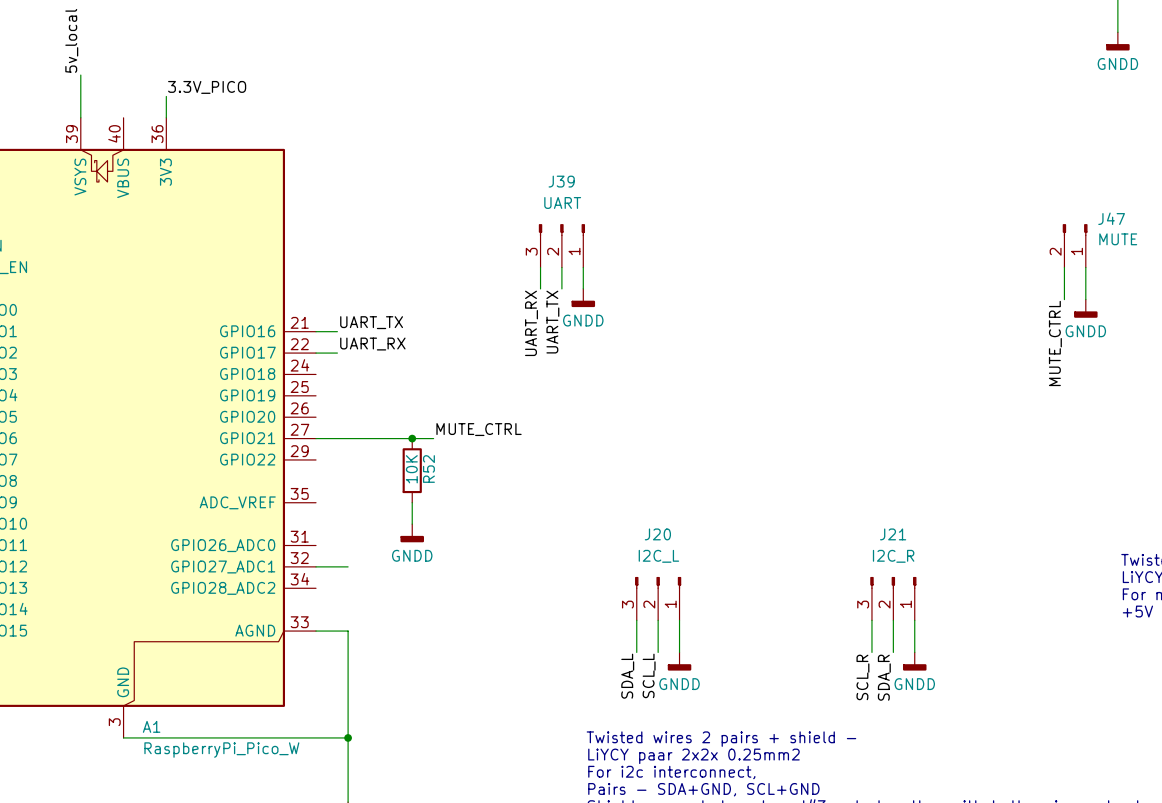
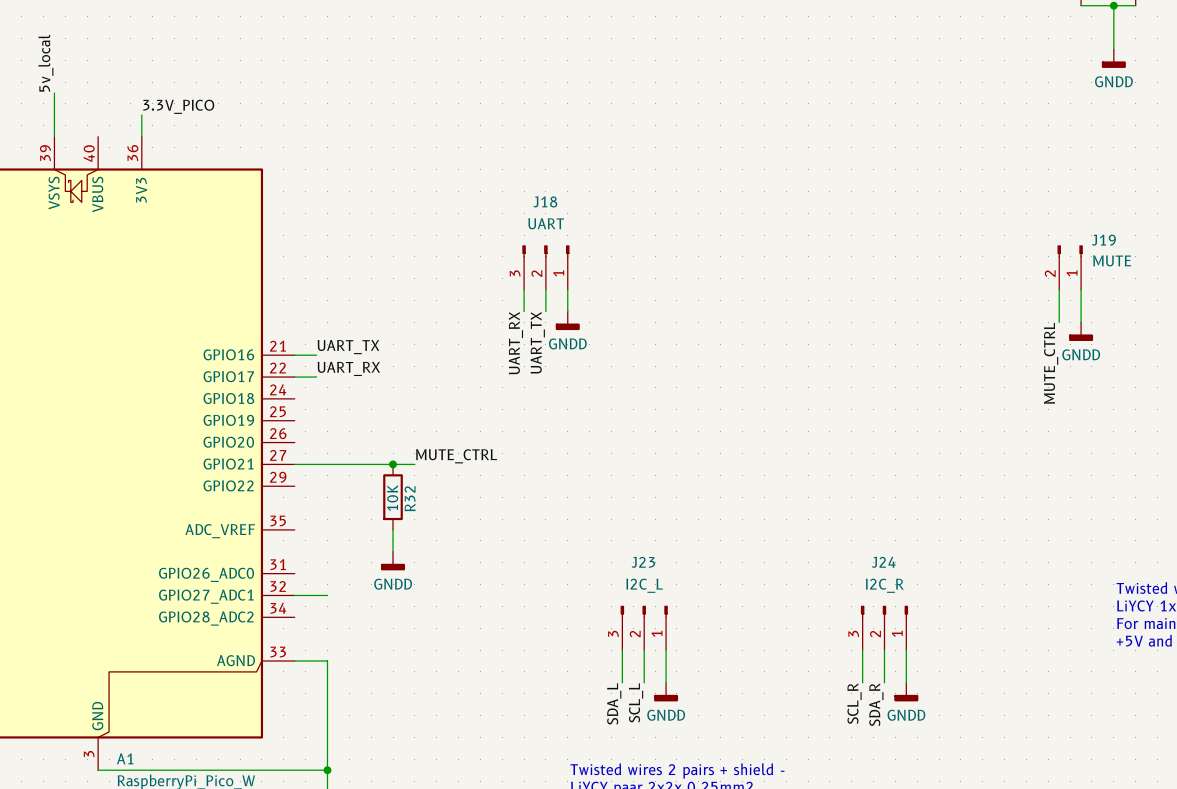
J39 name: J39 (561, 181) -> J18 (545, 201)
J47 name: J47 (1111, 218) -> J19 (1103, 240)
R52 name: R52 (428, 469) -> R32 (410, 498)
J20 name: J20 (657, 534) -> J23 (643, 562)
J21 name: J21 (893, 534) -> J24 (883, 562)

